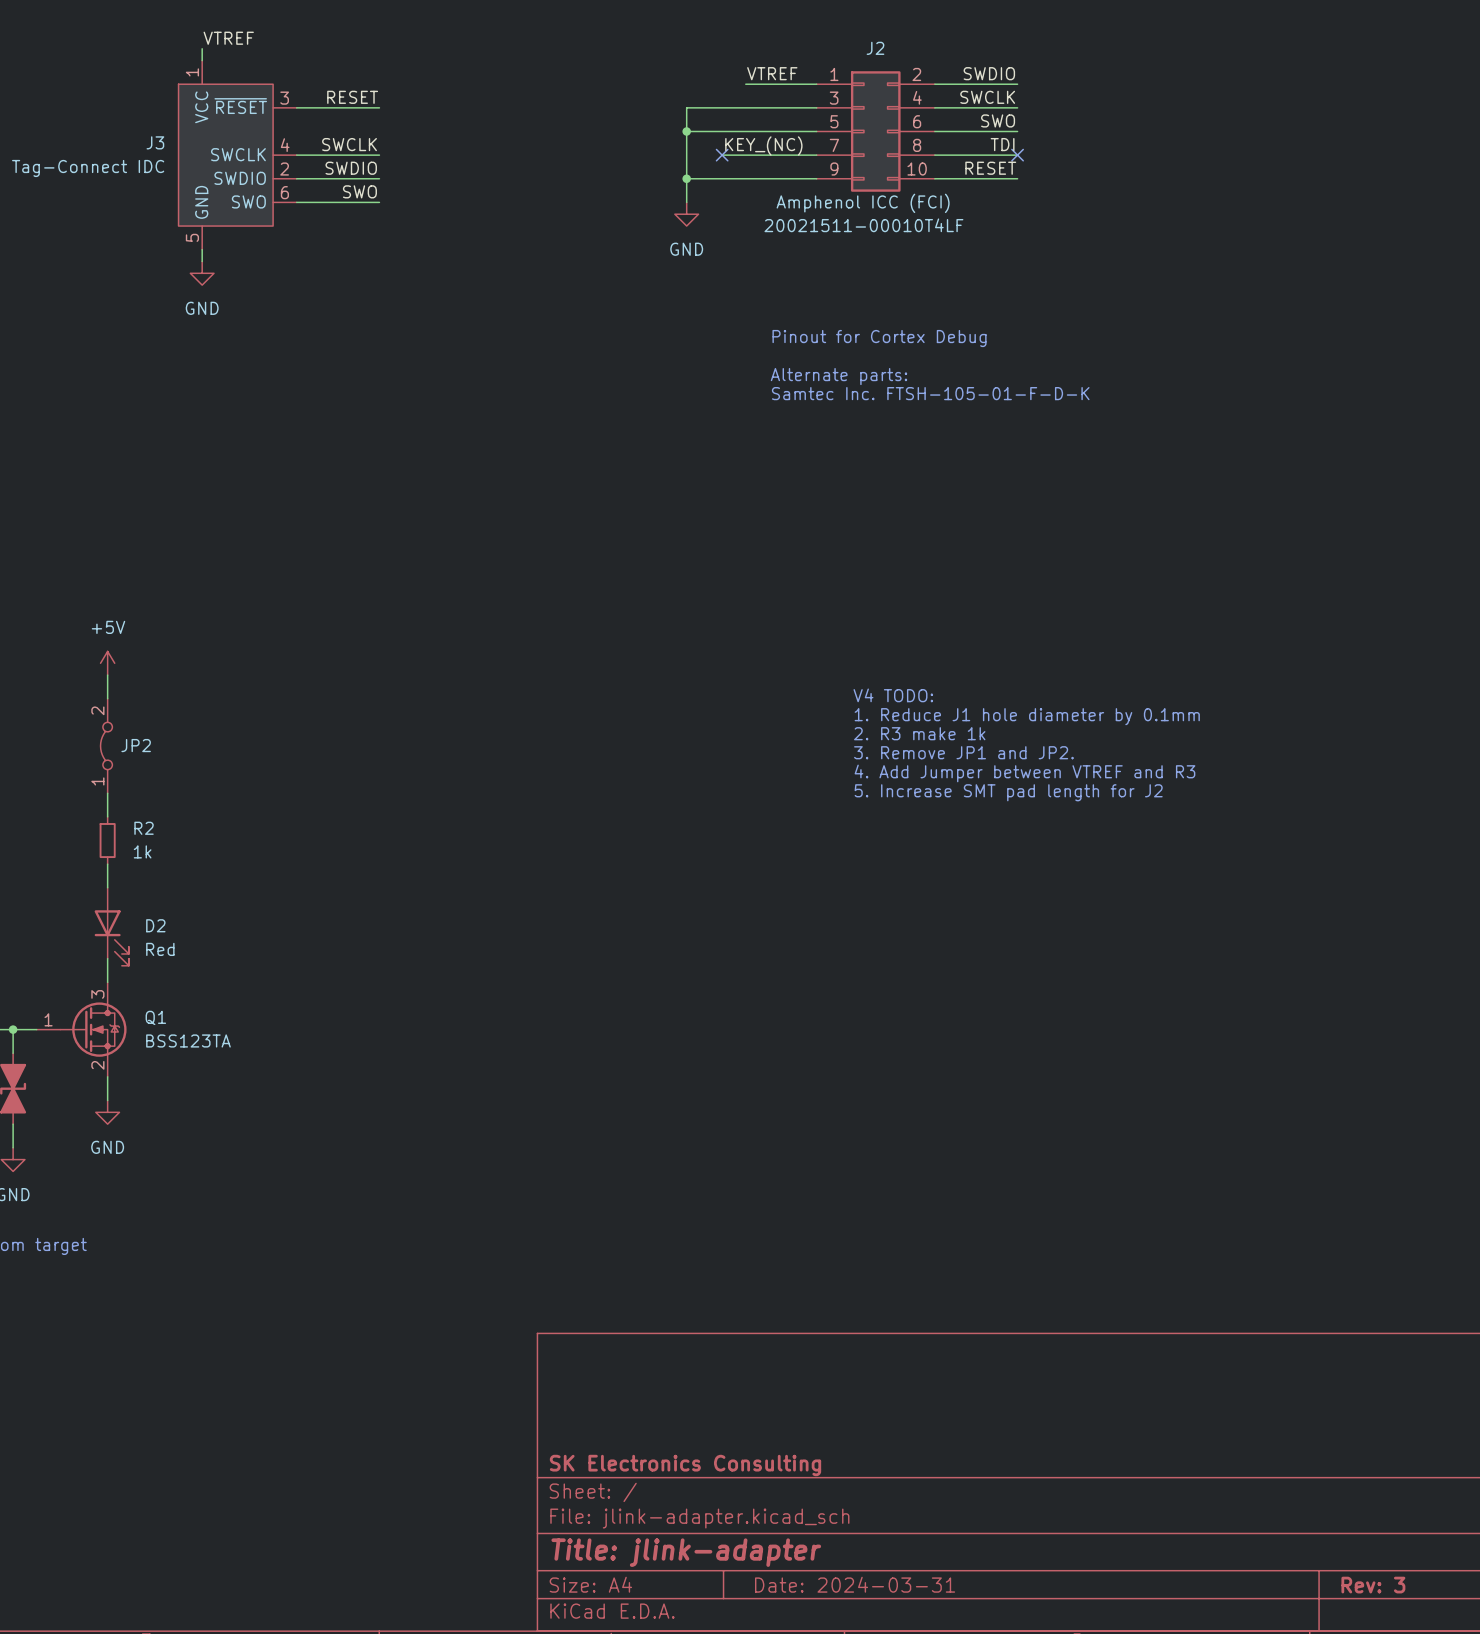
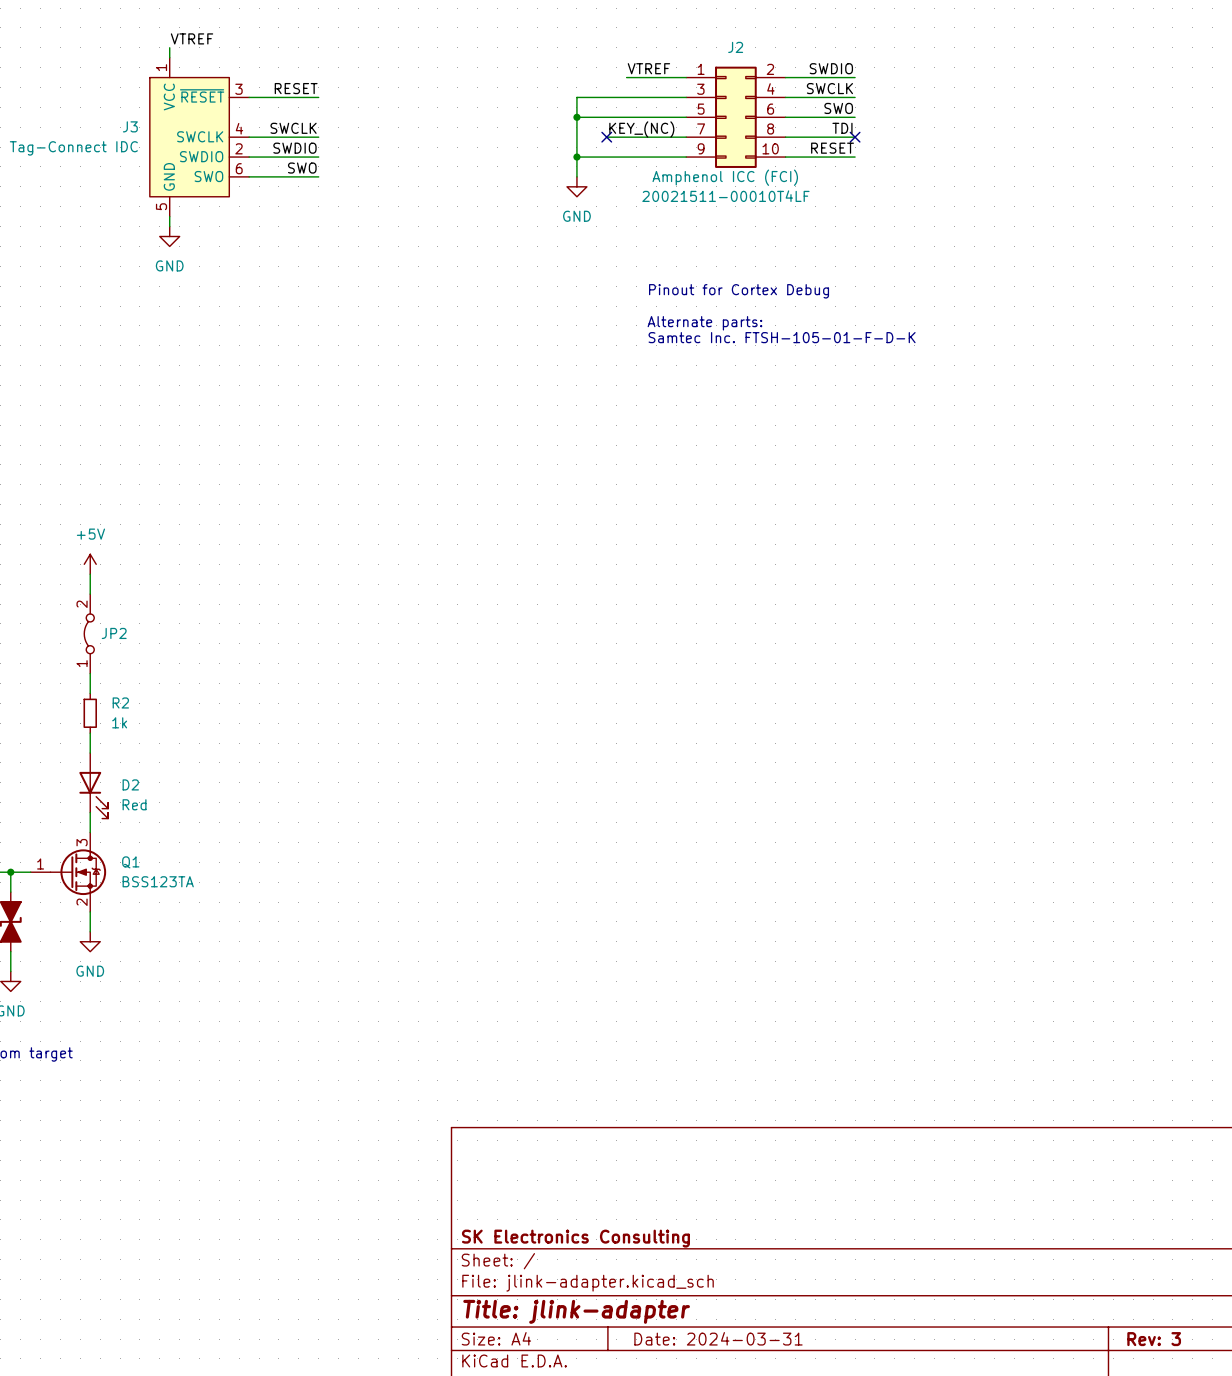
text: V4 TODO: (893, 695) -> none
text: 1. Reduce J1 hole diameter by 0.1mm (1027, 716) -> none
text: 2. R3 make 1k (919, 733) -> none
text: 3. Remove JP1 and JP2. (963, 752) -> none
text: 4. Add Jumper between VTREF and R3 (1024, 773) -> none
text: 5. Increase SMT pad length for J2 (1008, 792) -> none

